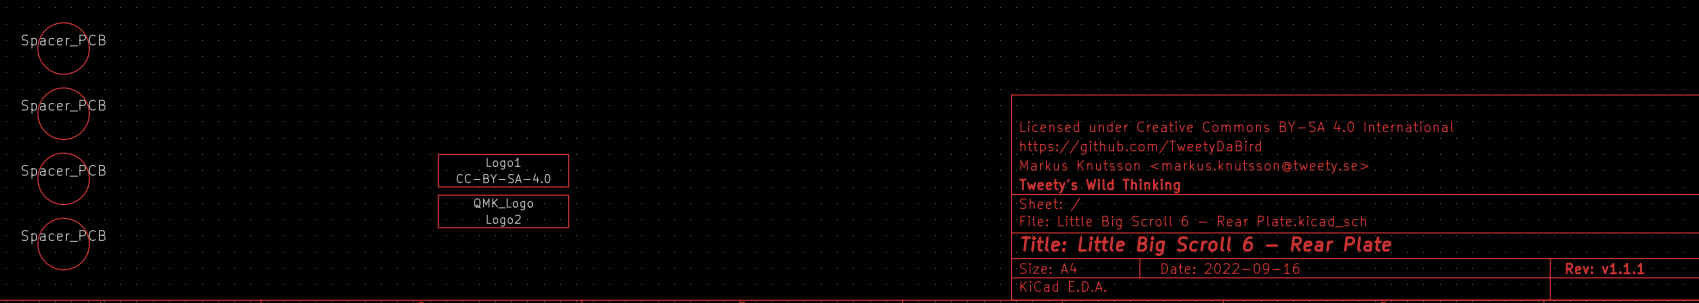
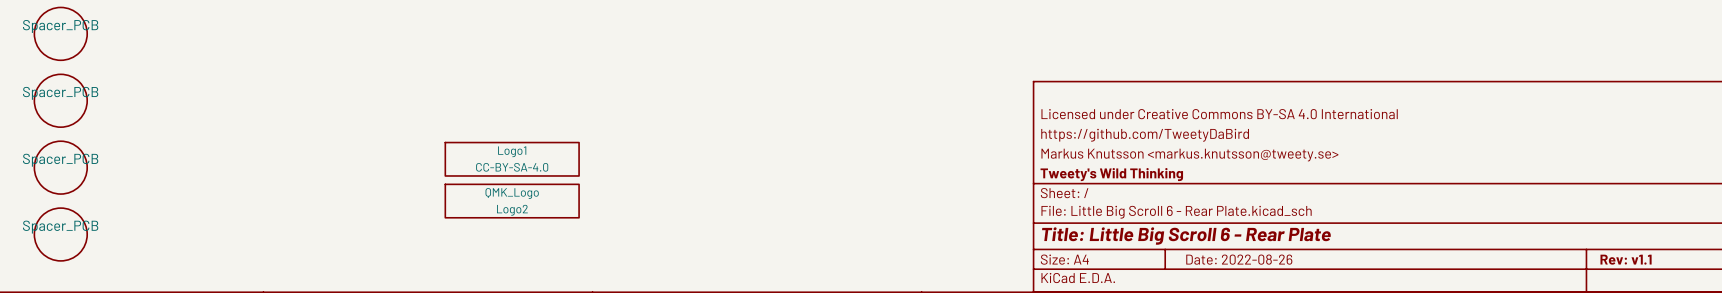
title block: Date: 2022-09-16 (1230, 268) -> Date: 2022-08-26 (1239, 259)
title block: Rev: v1.1.1 (1605, 268) -> Rev: v1.1 (1626, 259)

